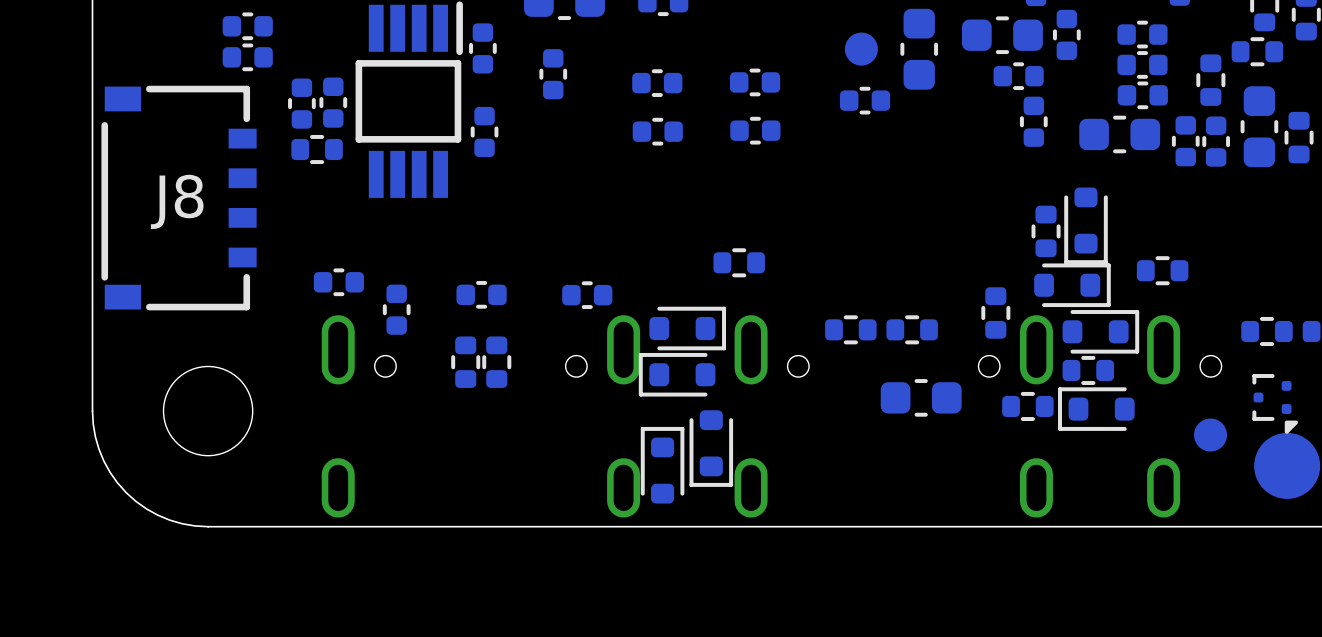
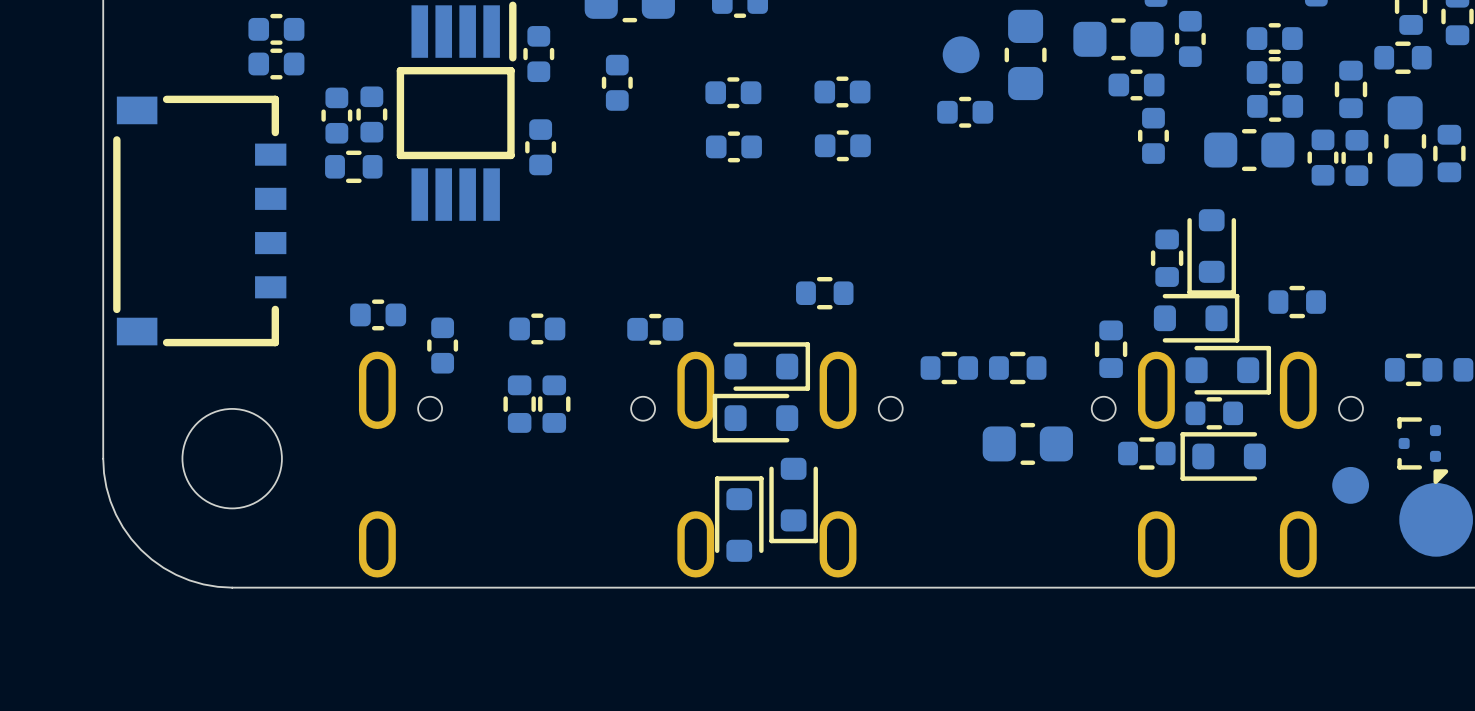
J8 name: J8 (177, 201) -> none

